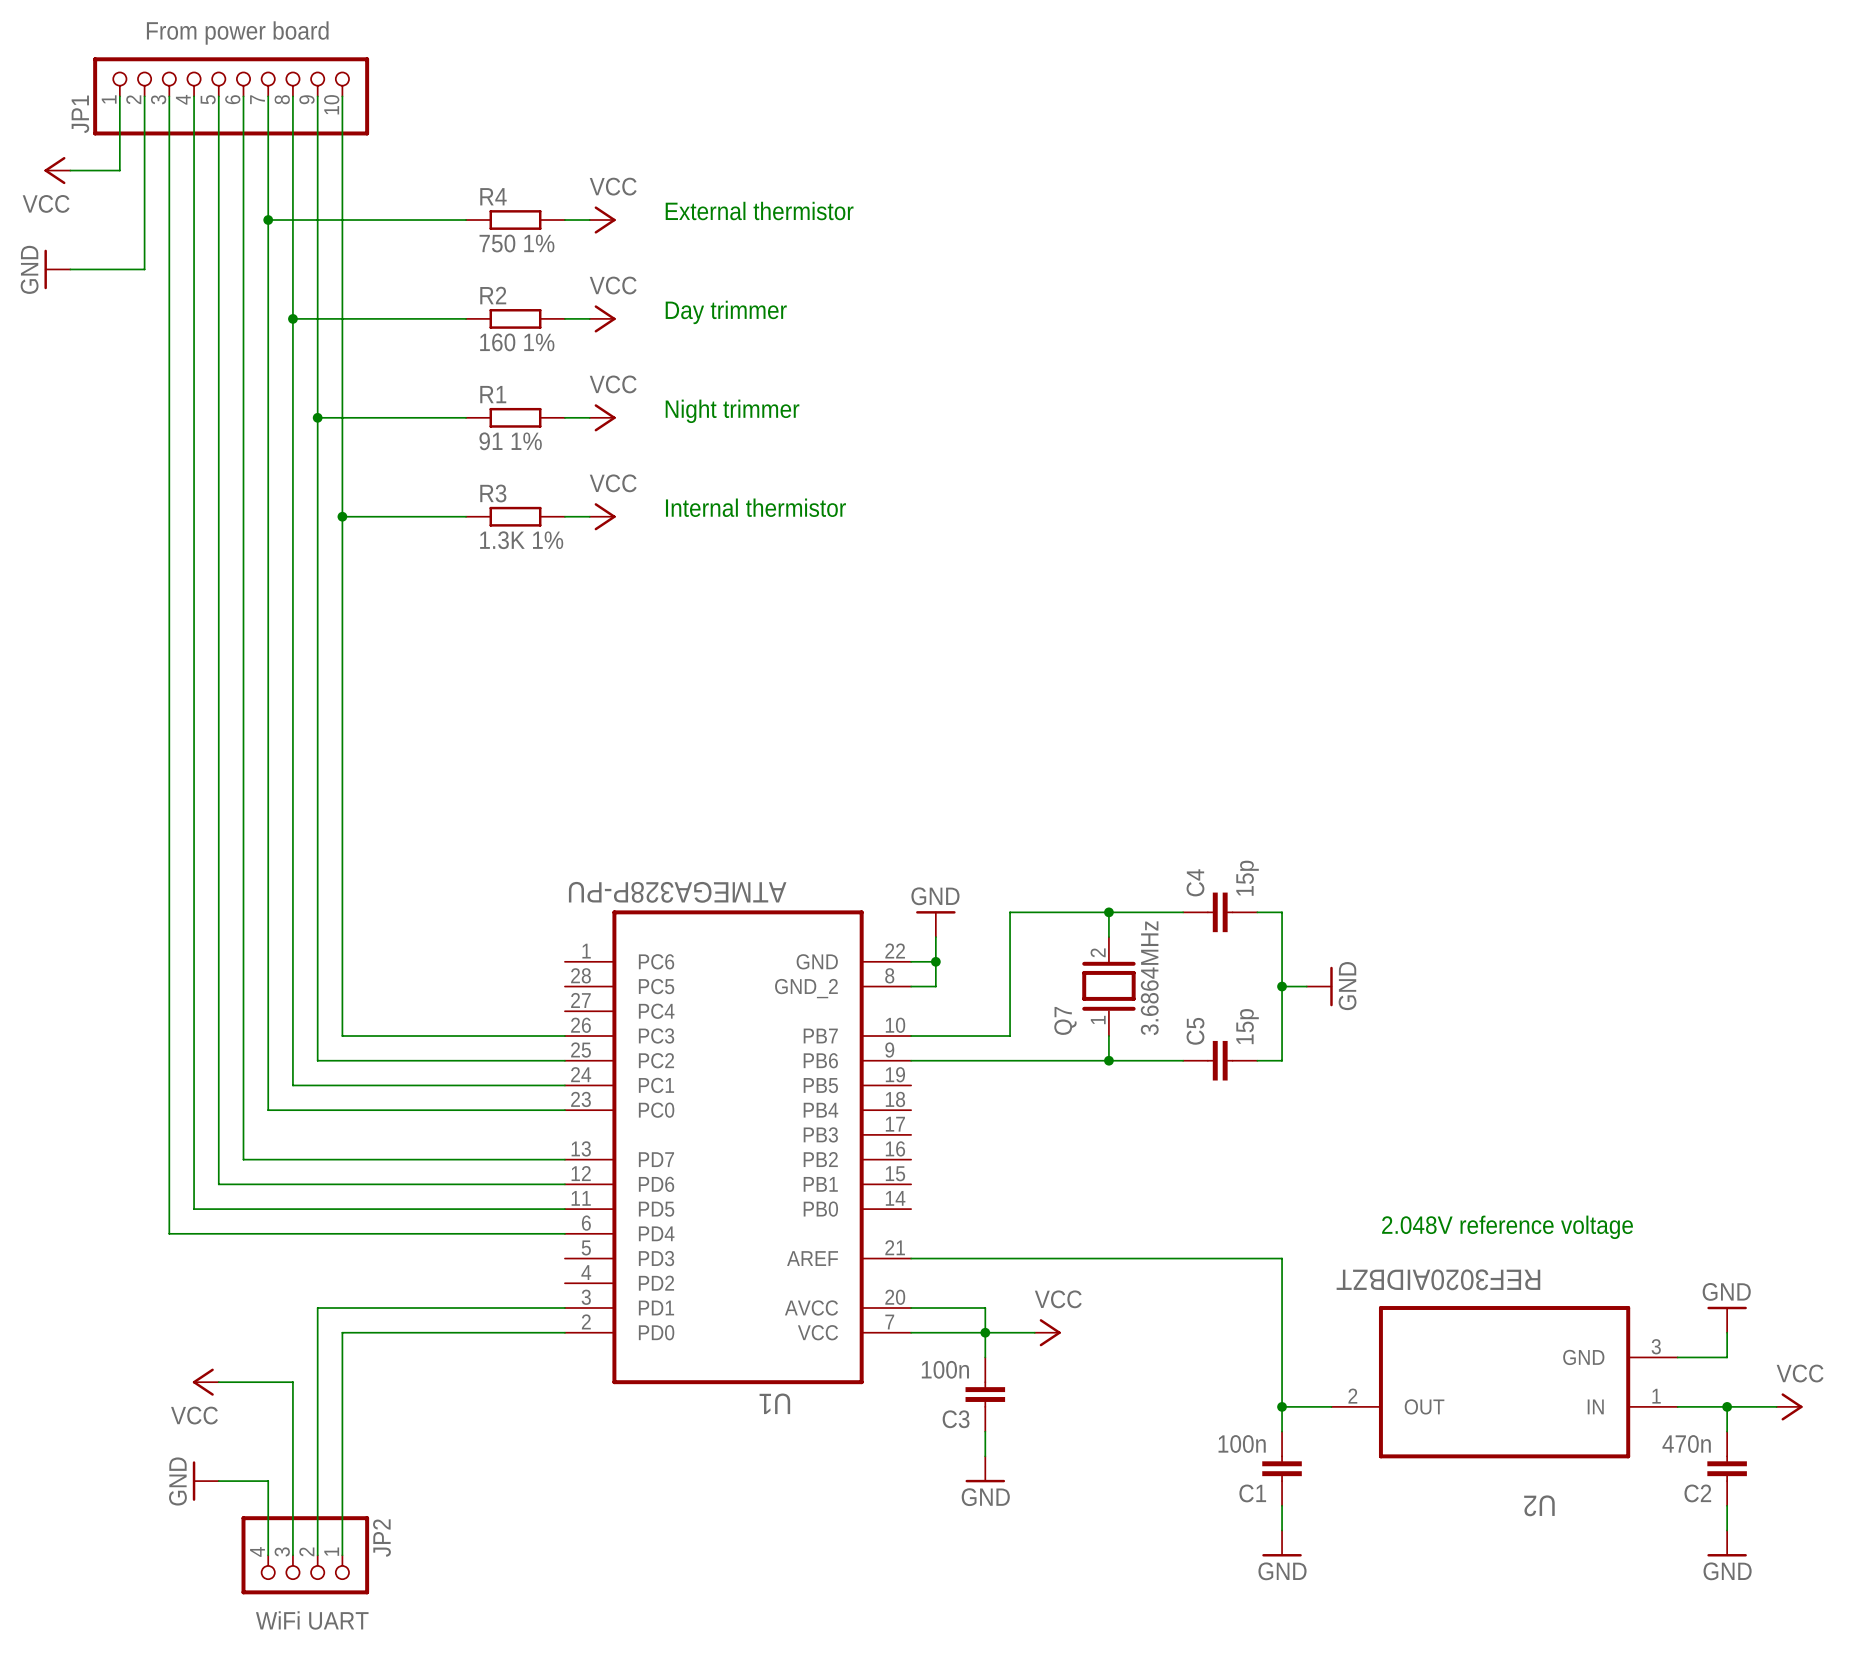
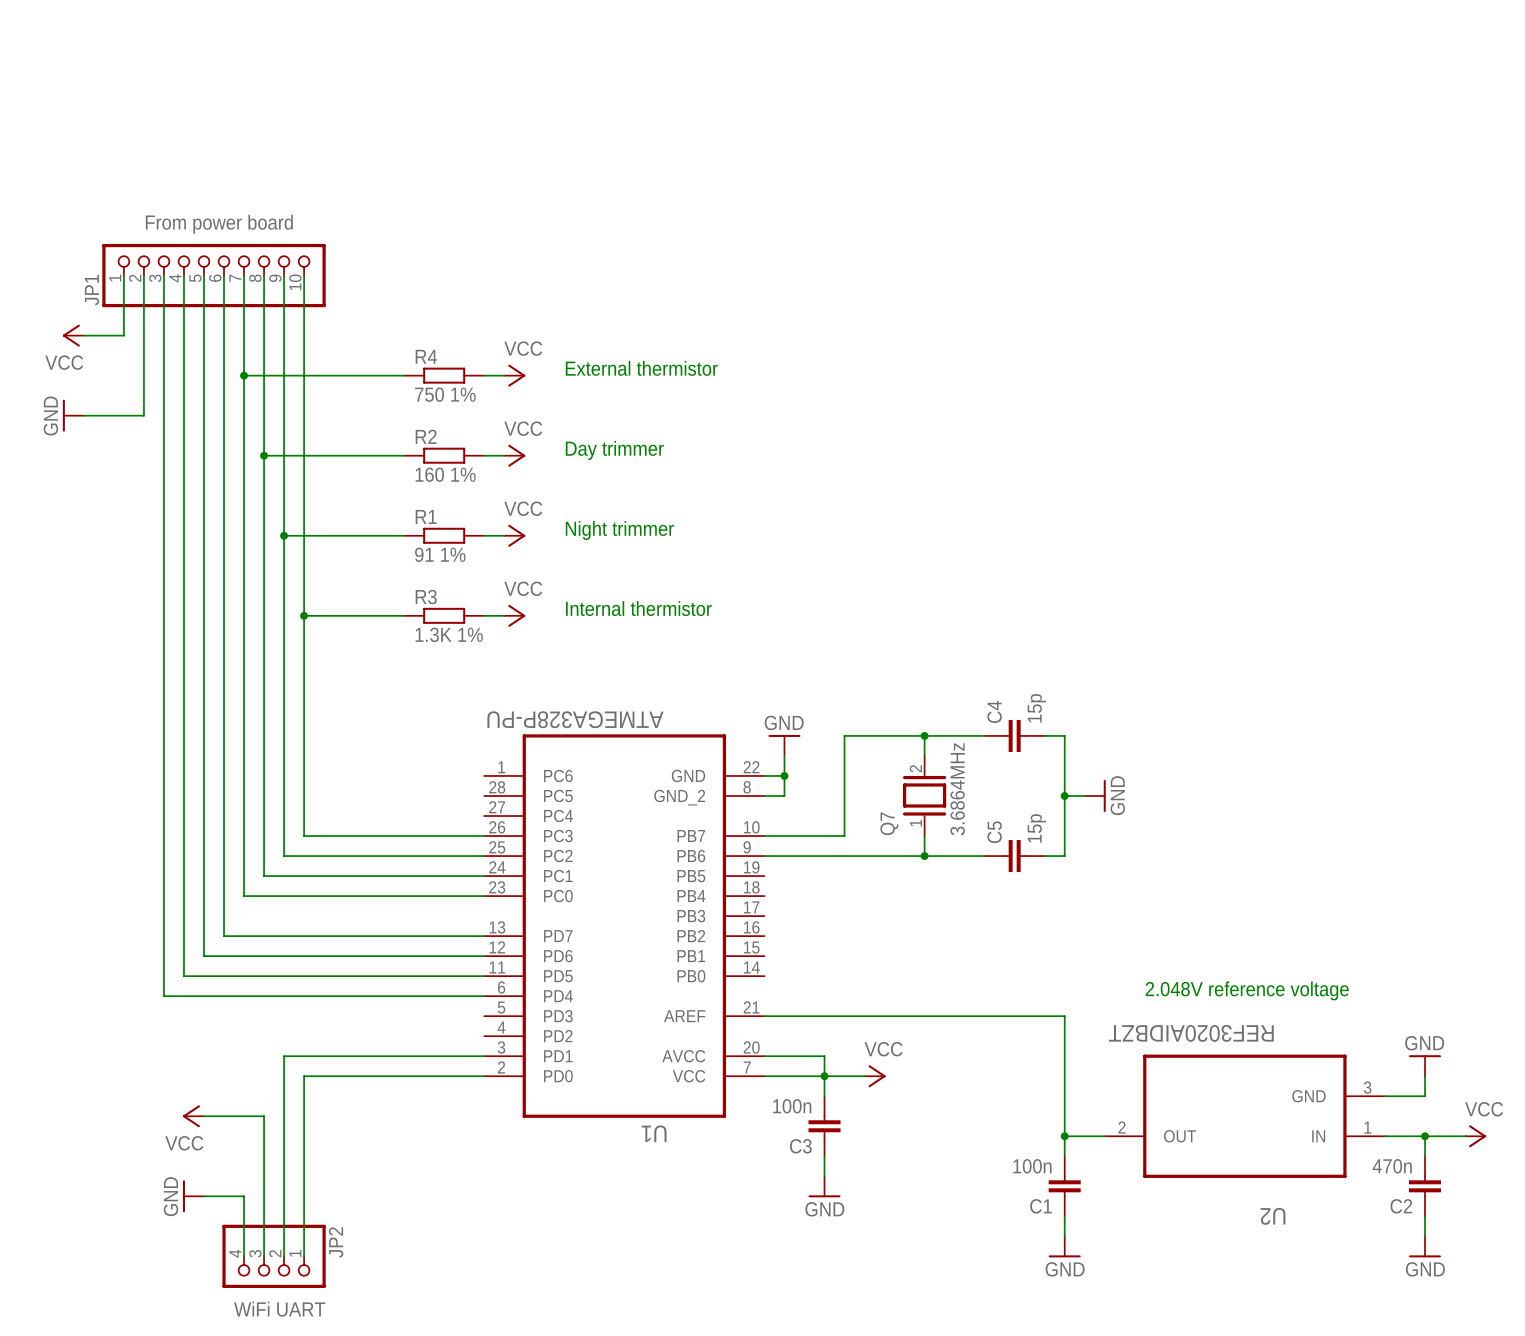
wire: (119, 96) (119, 170) (70, 170) -> none
wire: (144, 96) (144, 269) (70, 269) -> none
wire: (169, 96) (169, 343) -> none
wire: (194, 96) (194, 343) -> none
wire: (218, 96) (218, 343) -> none
JP1 position: (231, 96) -> (214, 275)
wire: (243, 96) (243, 343) -> none
wire: (268, 96) (268, 343) -> none
wire: (292, 96) (292, 343) -> none
wire: (317, 96) (317, 343) -> none
wire: (342, 96) (342, 343) -> none
power symbol: VCC (57, 170) -> none
text: External thermistor (759, 211) -> none
wire: (268, 220) (466, 220) -> none
junction: (268, 220) -> none
R4 position: (515, 220) -> (444, 375)
wire: (564, 220) (589, 220) -> none
power symbol: VCC (602, 220) -> none
power symbol: GND (57, 269) -> none
text: Day trimmer (726, 312) -> none
wire: (292, 318) (466, 318) -> none
junction: (292, 318) -> none
R2 position: (515, 318) -> (444, 455)
wire: (564, 318) (589, 318) -> (484, 375) (504, 375)
power symbol: VCC (602, 318) -> none
wire: none -> (123, 275) (123, 335) (83, 335)
wire: none -> (143, 275) (143, 415) (83, 415)
text: Night trimmer (732, 411) -> none
power symbol: none -> VCC (73, 335)
wire: (317, 417) (466, 417) -> none
junction: (317, 417) -> none
R1 position: (515, 417) -> (444, 535)
wire: (564, 417) (589, 417) -> (484, 455) (504, 455)
power symbol: VCC (602, 417) -> none
text: none -> External thermistor (641, 368)
wire: none -> (244, 375) (404, 375)
junction: none -> (244, 375)
power symbol: none -> VCC (514, 375)
text: Internal thermistor (755, 507) -> none
power symbol: none -> GND (73, 415)
wire: (342, 516) (466, 516) -> none
junction: (342, 516) -> none
R3 position: (515, 516) -> (444, 615)
wire: (564, 516) (589, 516) -> (484, 535) (504, 535)
power symbol: VCC (602, 516) -> none
text: none -> Day trimmer (614, 450)
wire: none -> (264, 455) (404, 455)
junction: none -> (264, 455)
power symbol: none -> VCC (514, 455)
text: none -> Night trimmer (619, 530)
wire: none -> (284, 535) (404, 535)
junction: none -> (284, 535)
power symbol: none -> VCC (514, 535)
text: none -> Internal thermistor (638, 608)
wire: none -> (304, 615) (404, 615)
junction: none -> (304, 615)
wire: none -> (484, 615) (504, 615)
power symbol: none -> VCC (514, 615)

